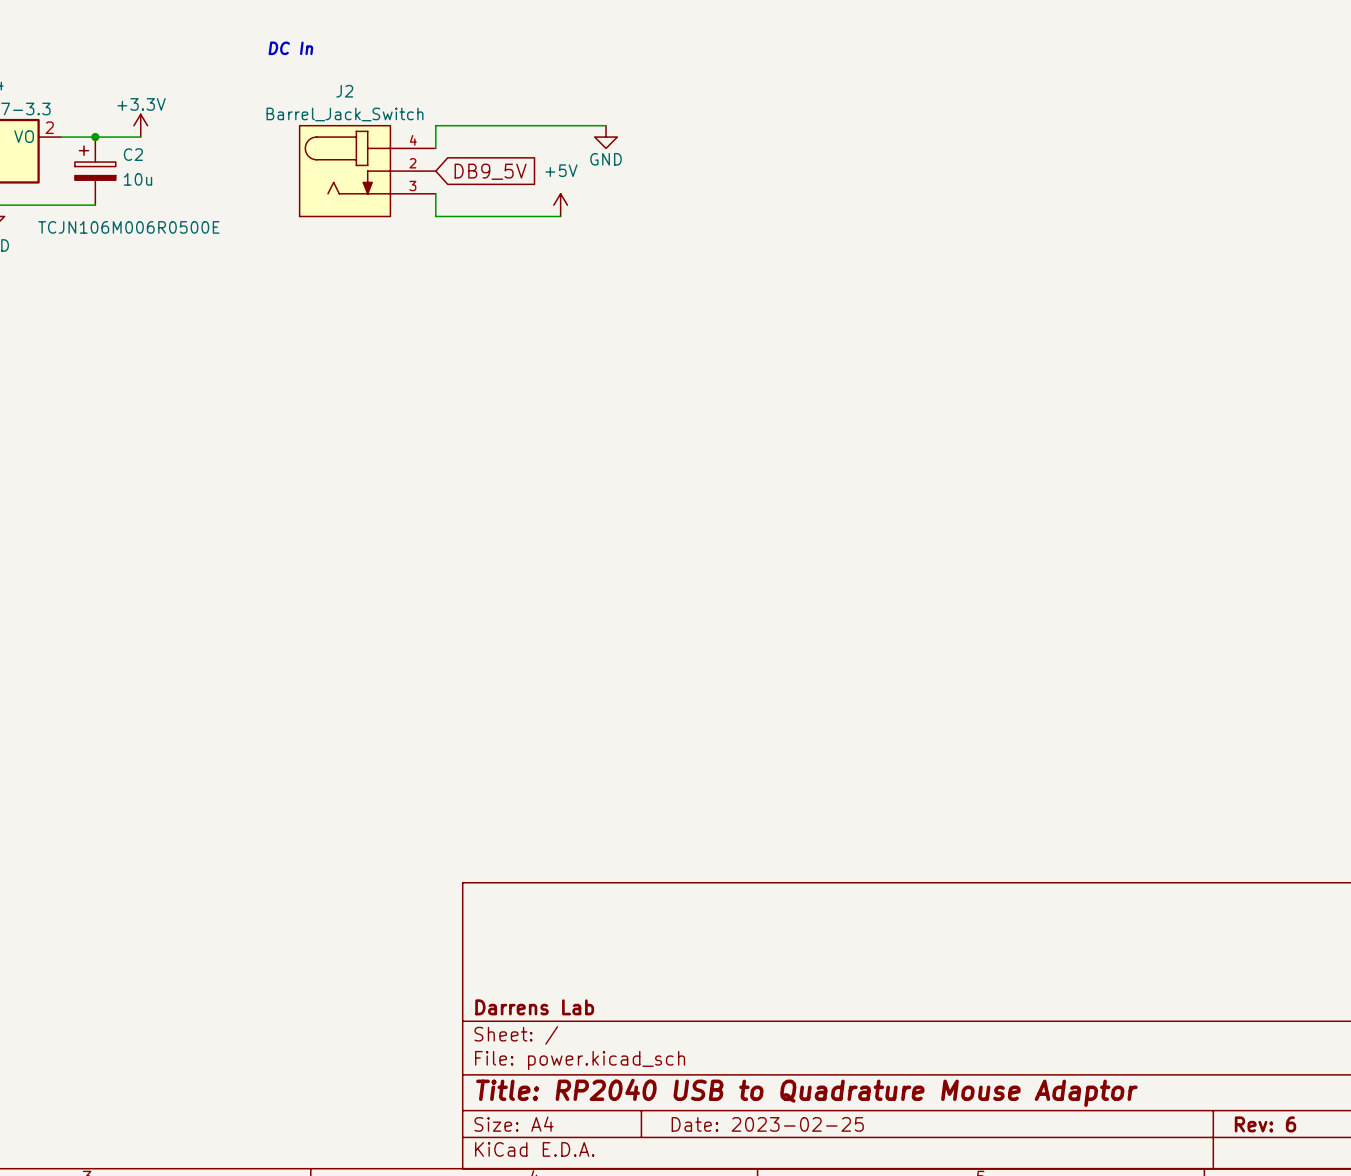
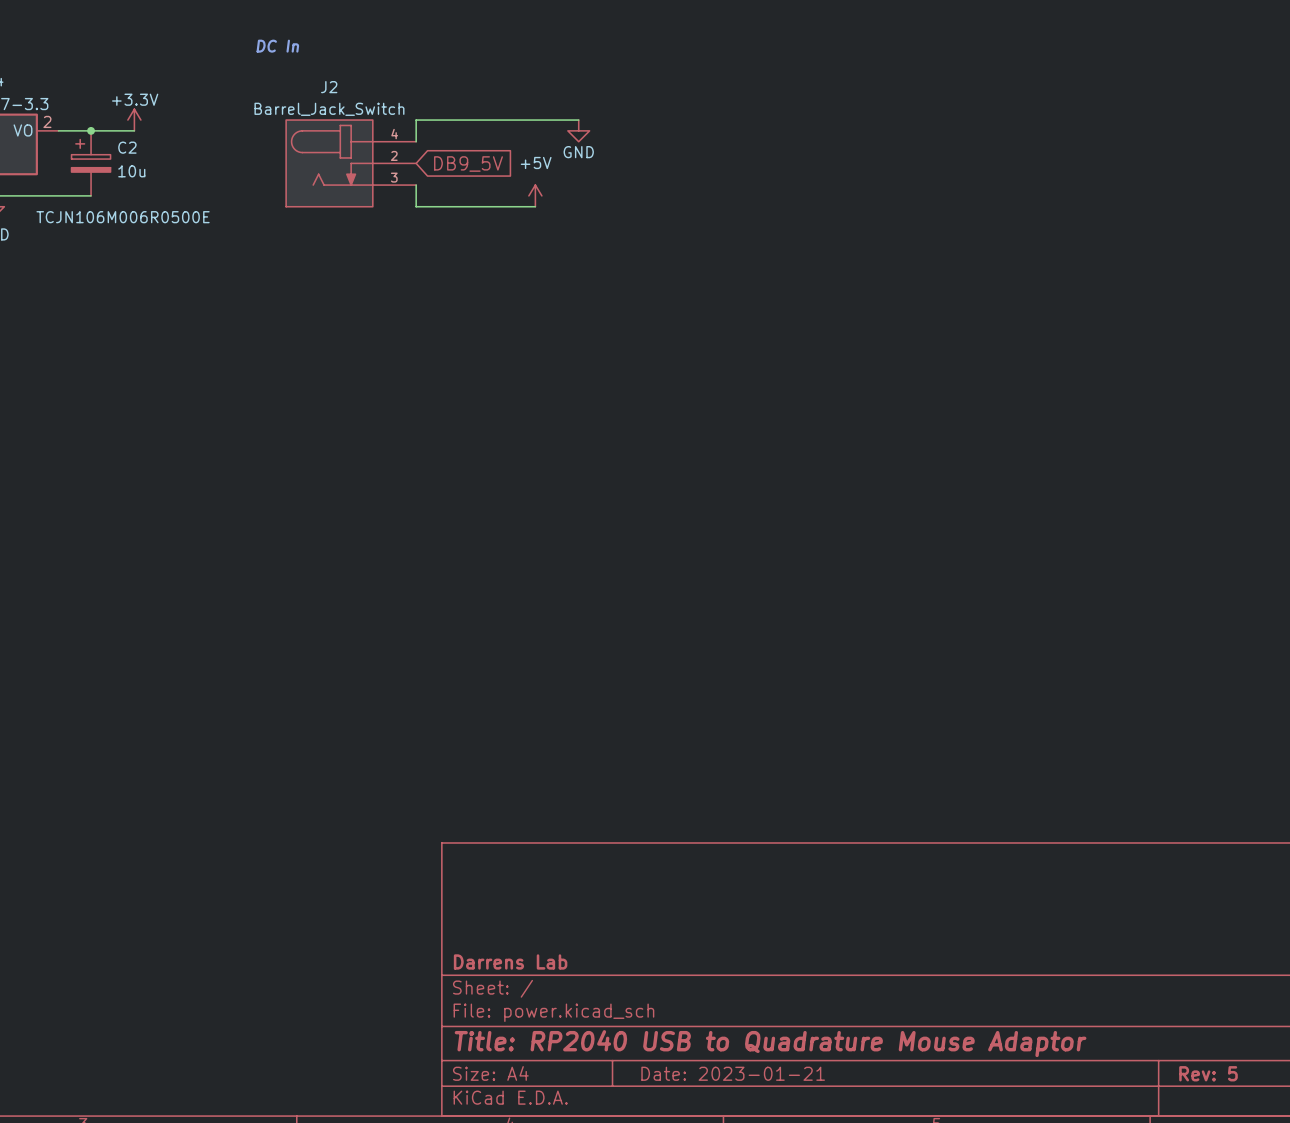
title block: Date: 2023-02-25 (767, 1124) -> Date: 2023-01-21 (733, 1073)
title block: Rev: 6 (1265, 1124) -> Rev: 5 (1208, 1073)

